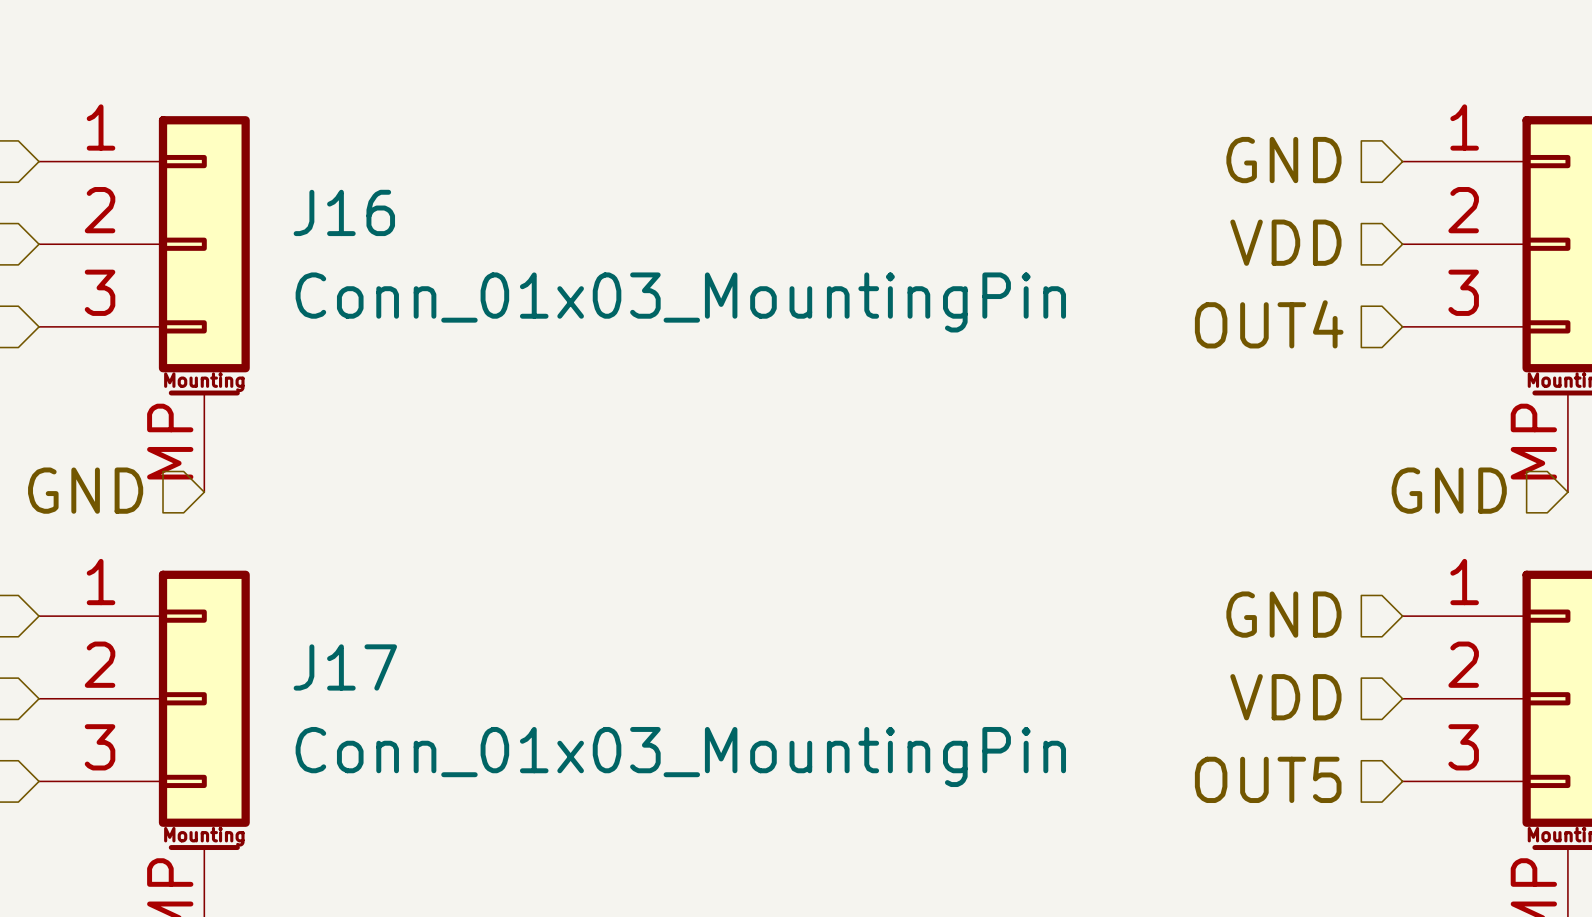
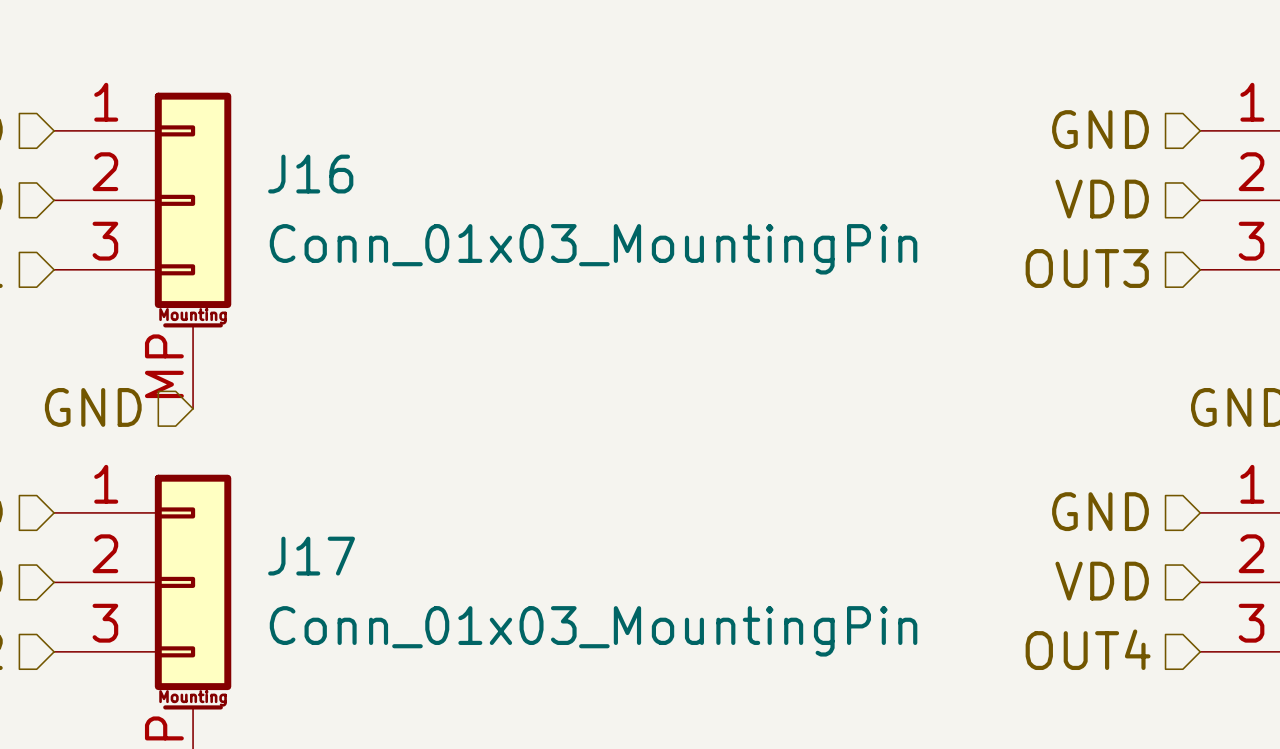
hierarchical label: OUT4 (1269, 324) -> OUT3 (1087, 268)
hierarchical label: OUT5 (1268, 779) -> OUT4 (1088, 649)

